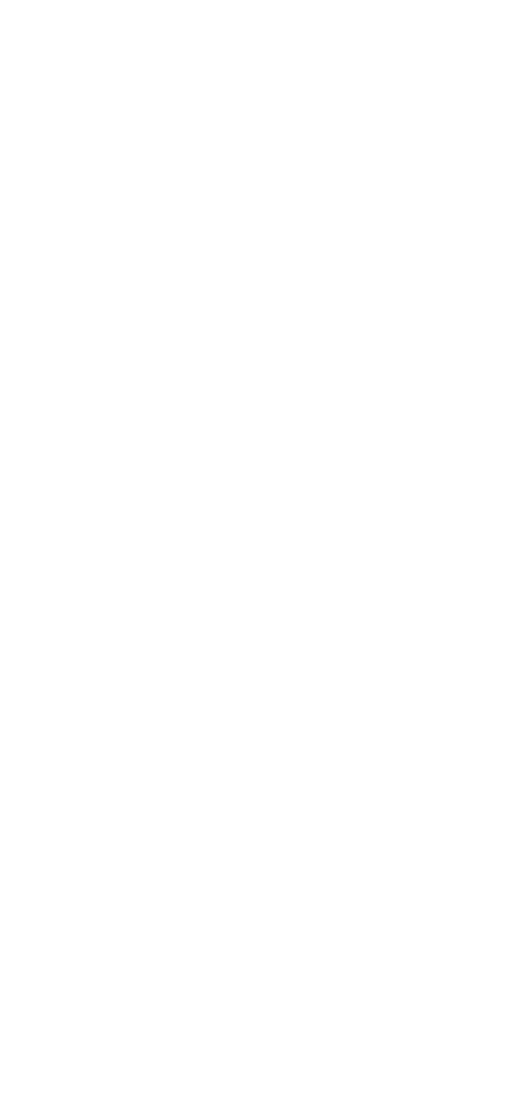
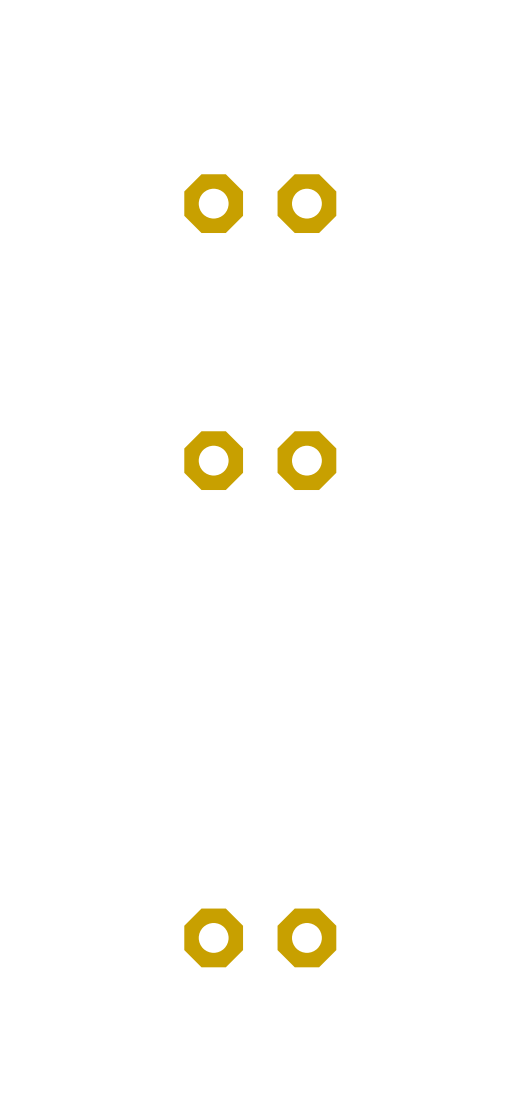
part: none -> (260, 203)
part: none -> (260, 460)
part: none -> (260, 937)

